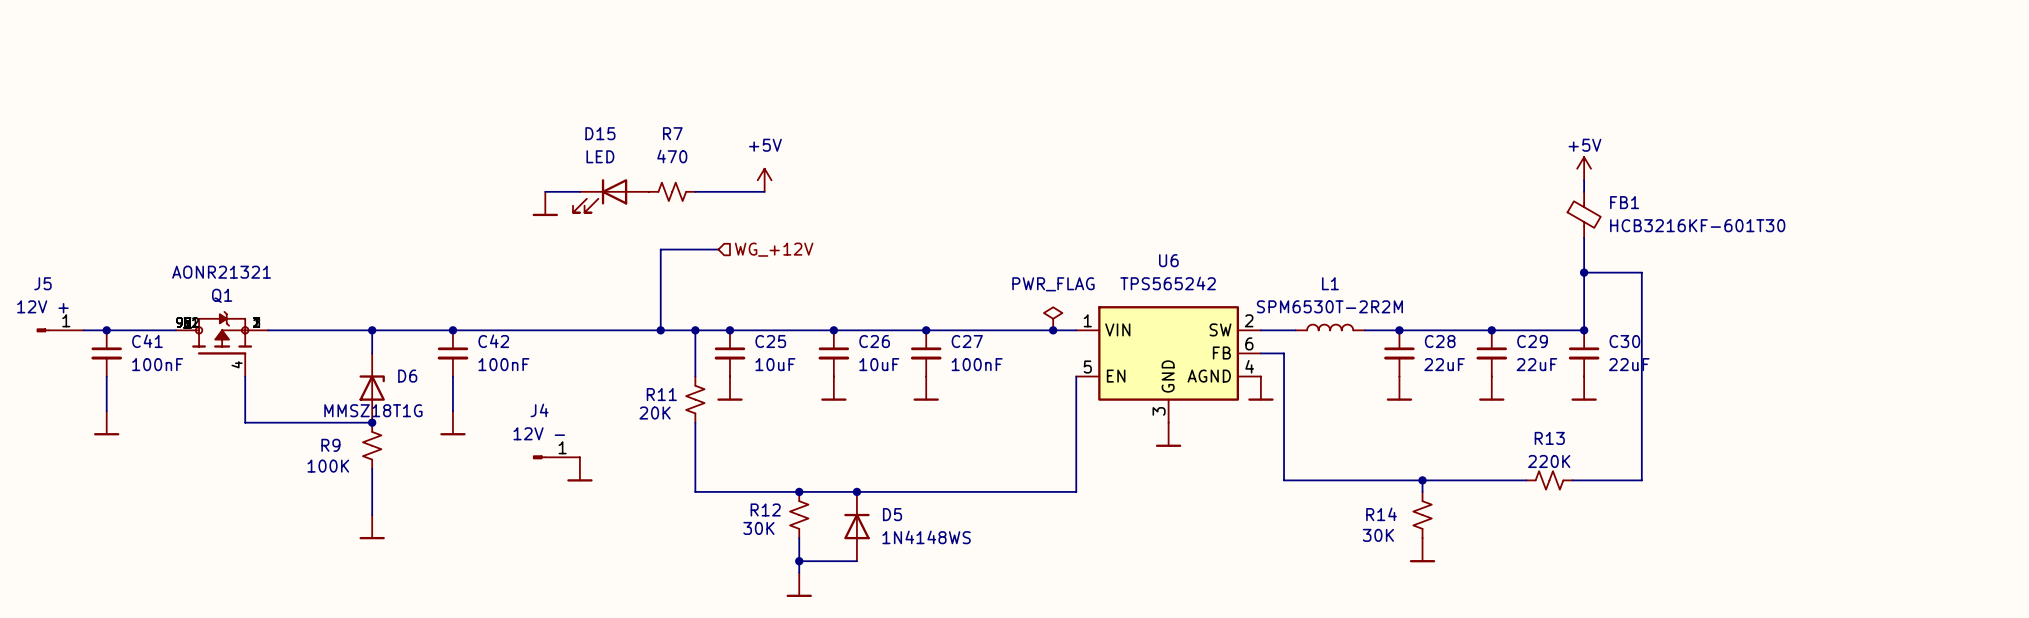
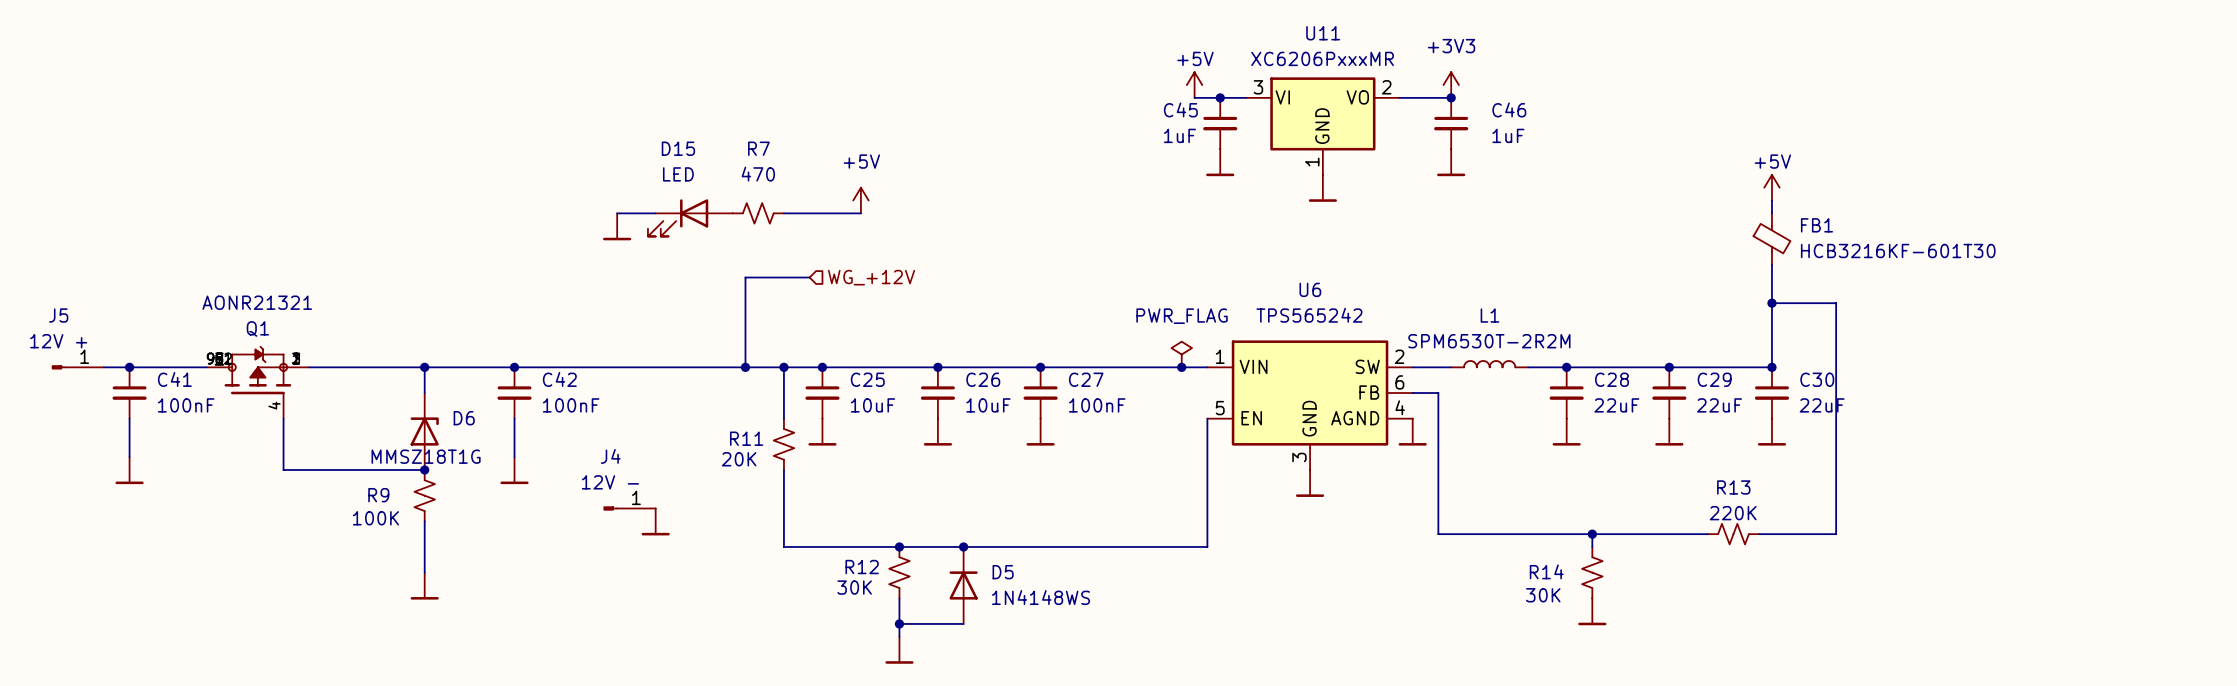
power symbol: none -> +5V (1194, 85)
power symbol: none -> +3V3 (1451, 85)
wire: none -> (1194, 97) (1245, 97)
junction: none -> (1220, 97)
wire: none -> (1399, 97) (1451, 97)
junction: none -> (1451, 97)
C45: none -> 1uF (1220, 123)
C46: none -> 1uF (1451, 123)
U11: none -> XC6206PxxxMR (1322, 126)
power symbol: none -> (1220, 162)
power symbol: none -> (1451, 162)
power symbol: none -> (1322, 188)

